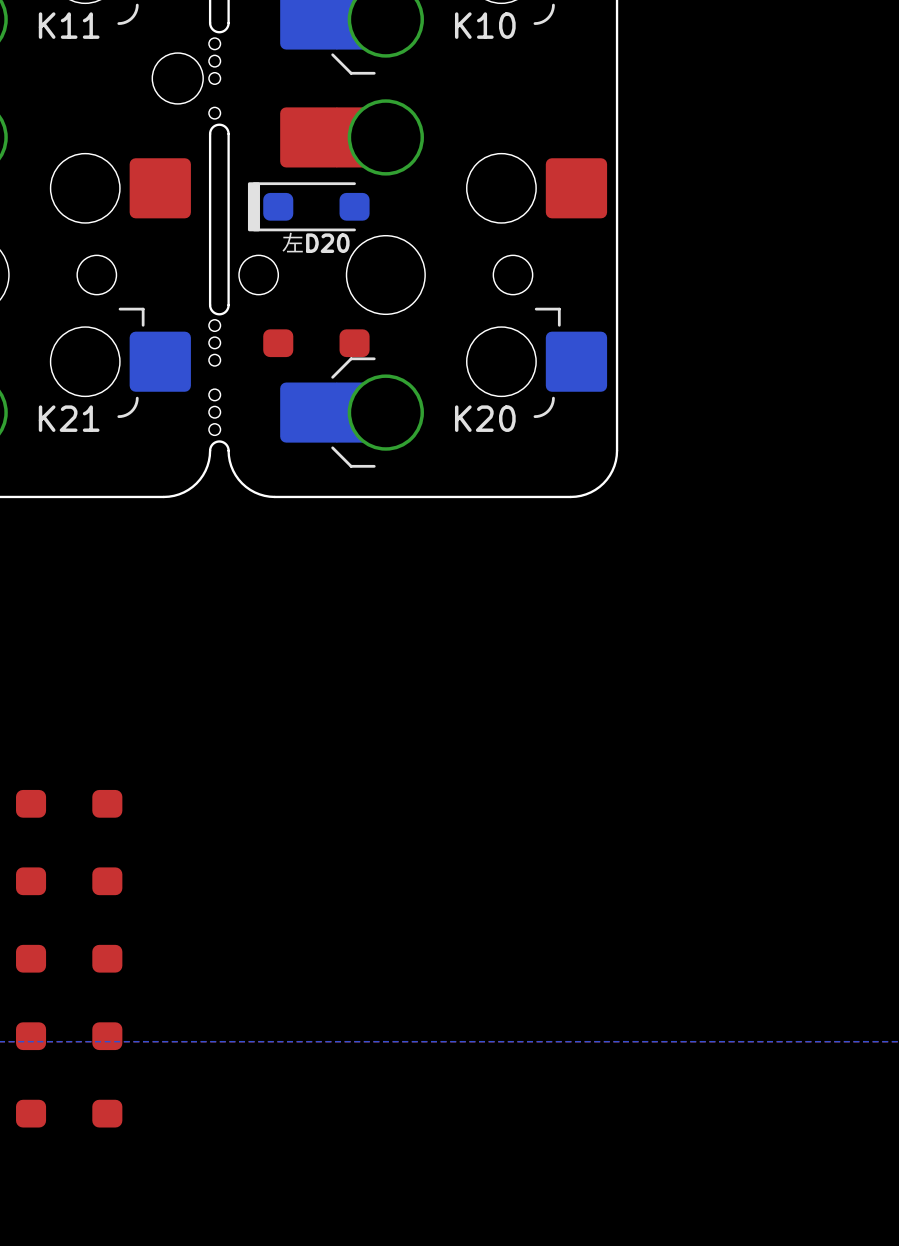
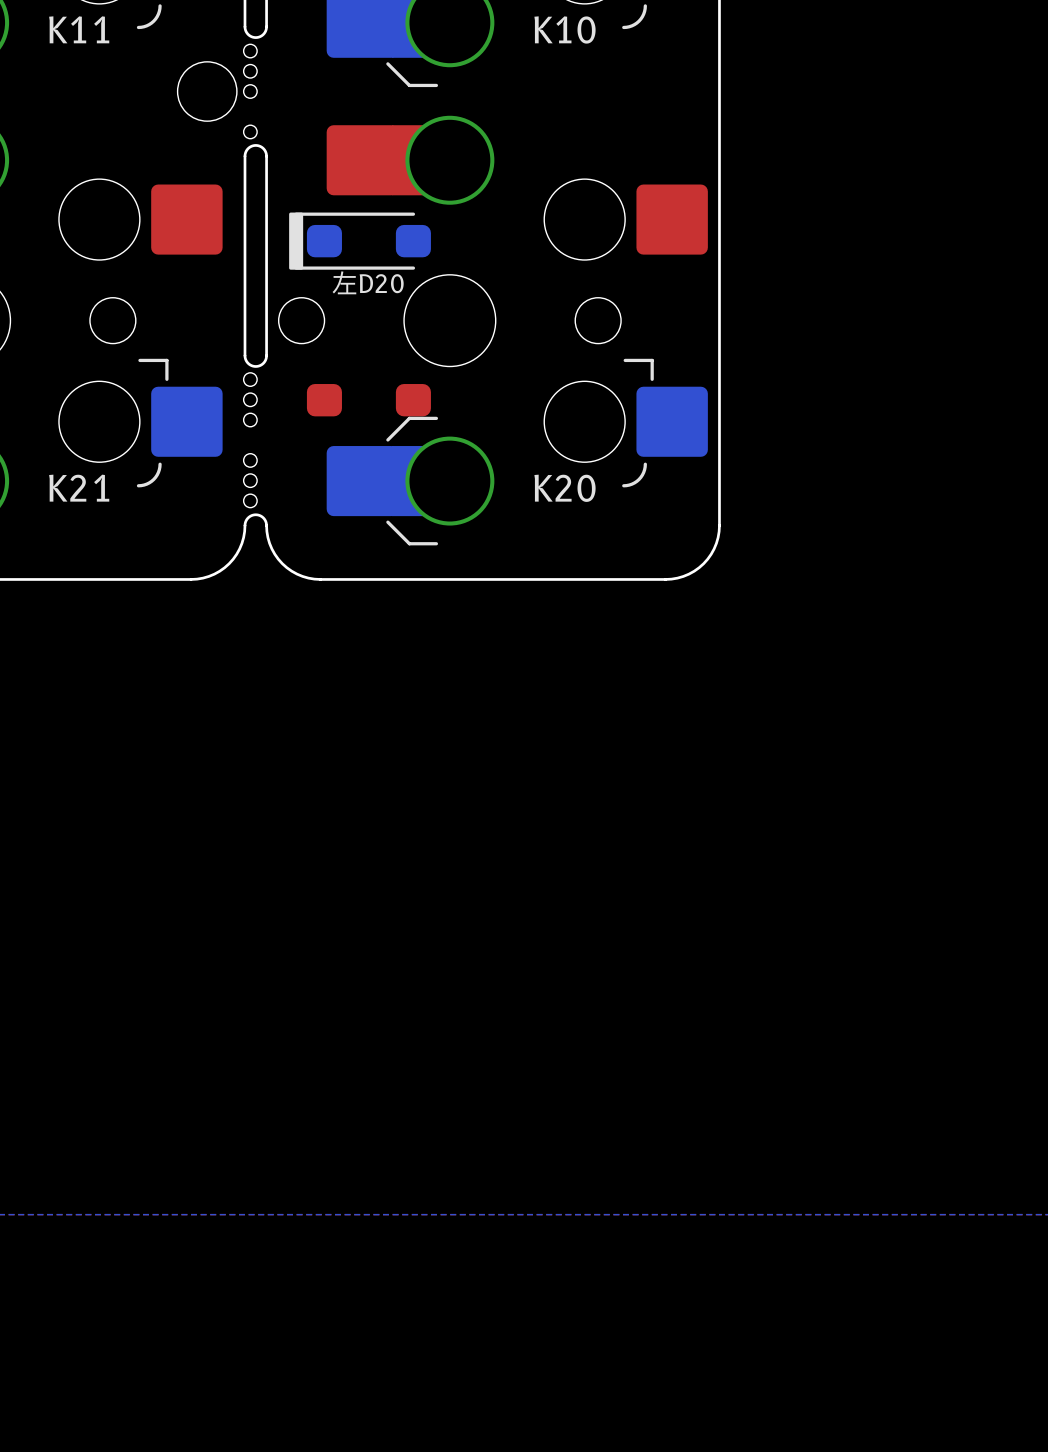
part: (69, 803) -> none
part: (69, 881) -> none
part: (69, 958) -> none
part: (69, 1036) -> none
part: (69, 1113) -> none

